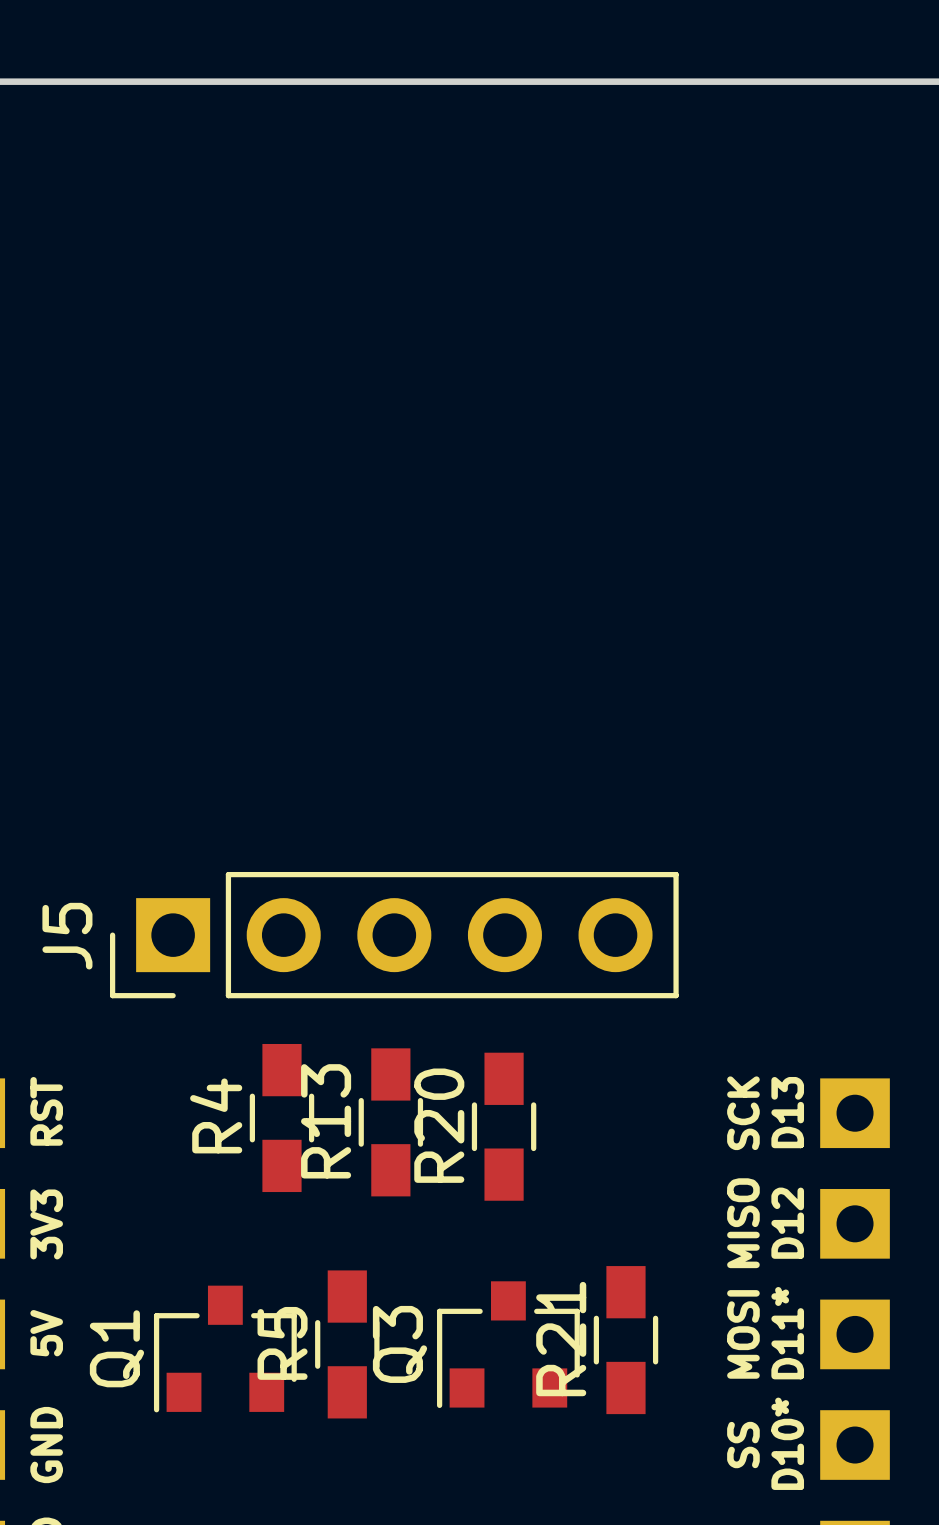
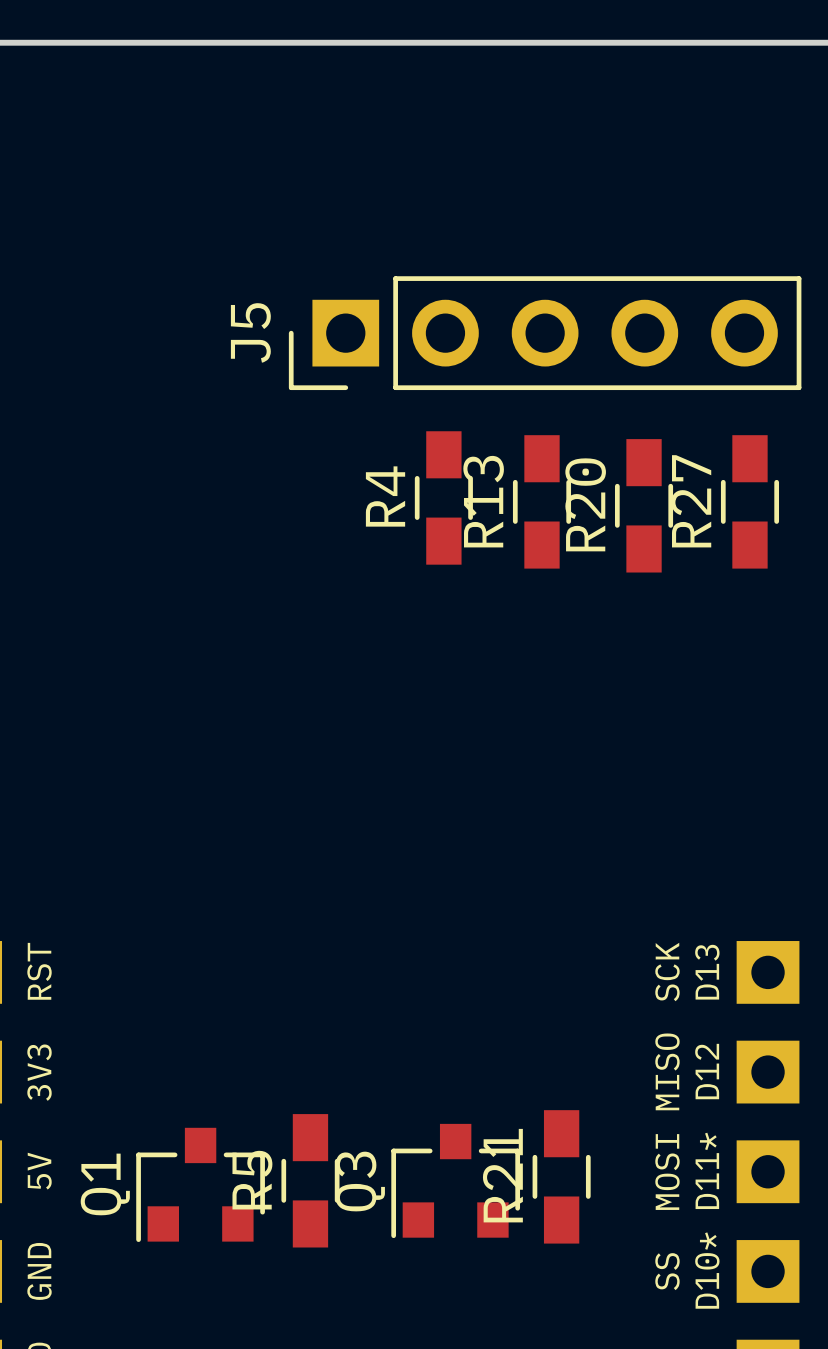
R27: none -> (749, 501)
J5 position: (394, 935) -> (545, 333)
R4 position: (281, 1118) -> (443, 497)
R13 position: (390, 1122) -> (541, 501)
R20 position: (504, 1126) -> (644, 505)

